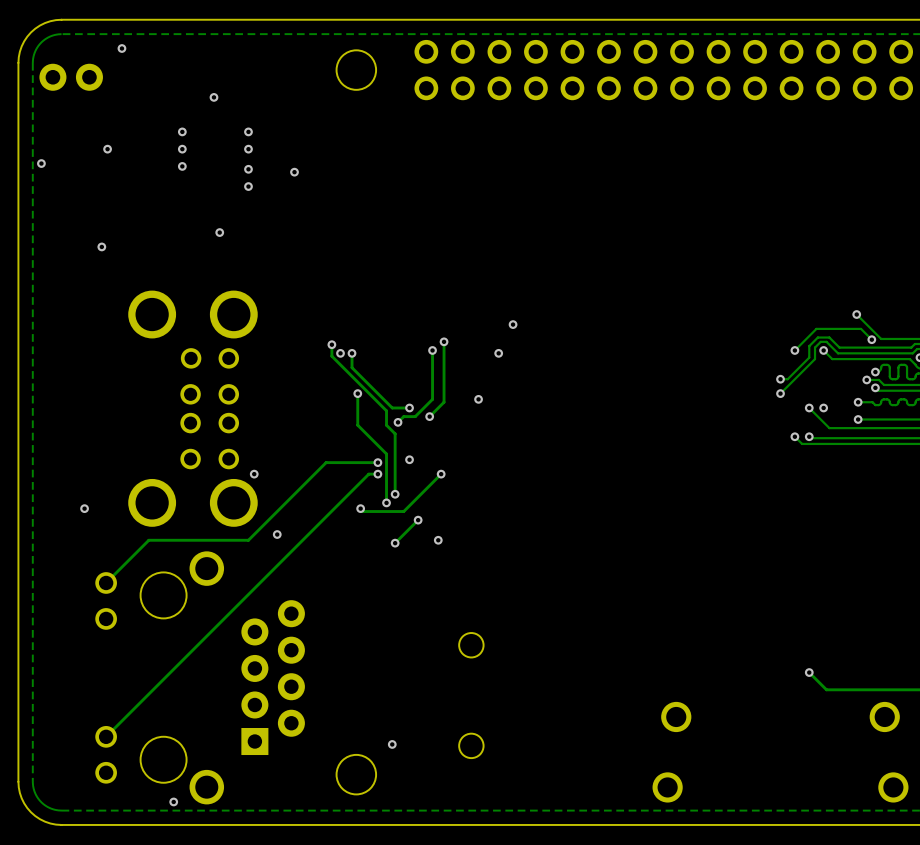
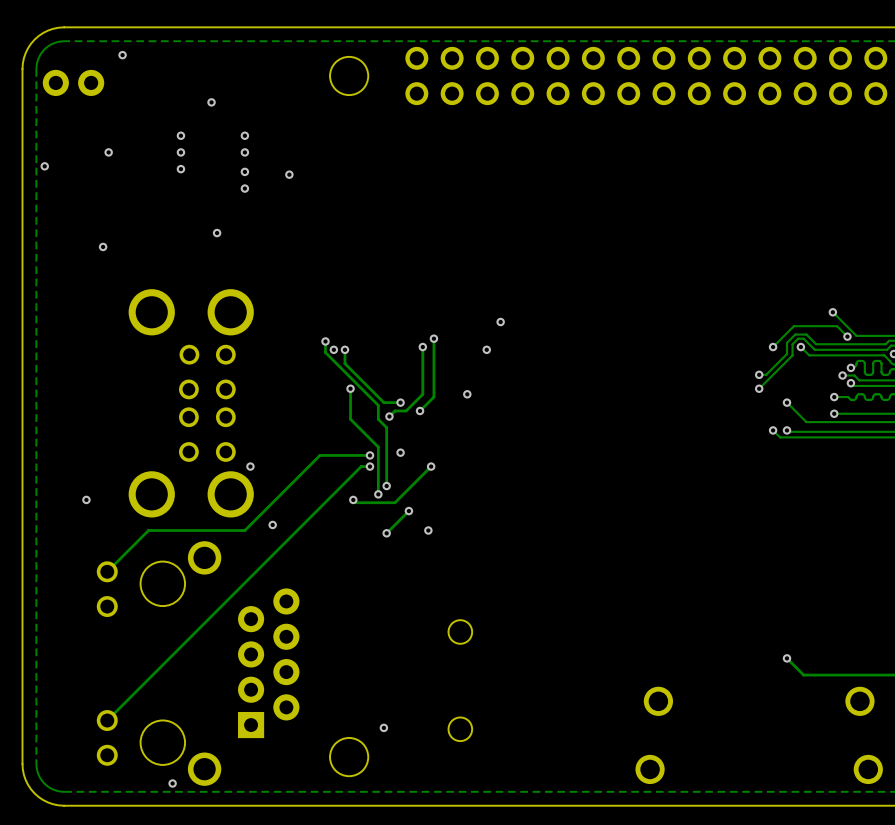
via: (823, 407) -> none

